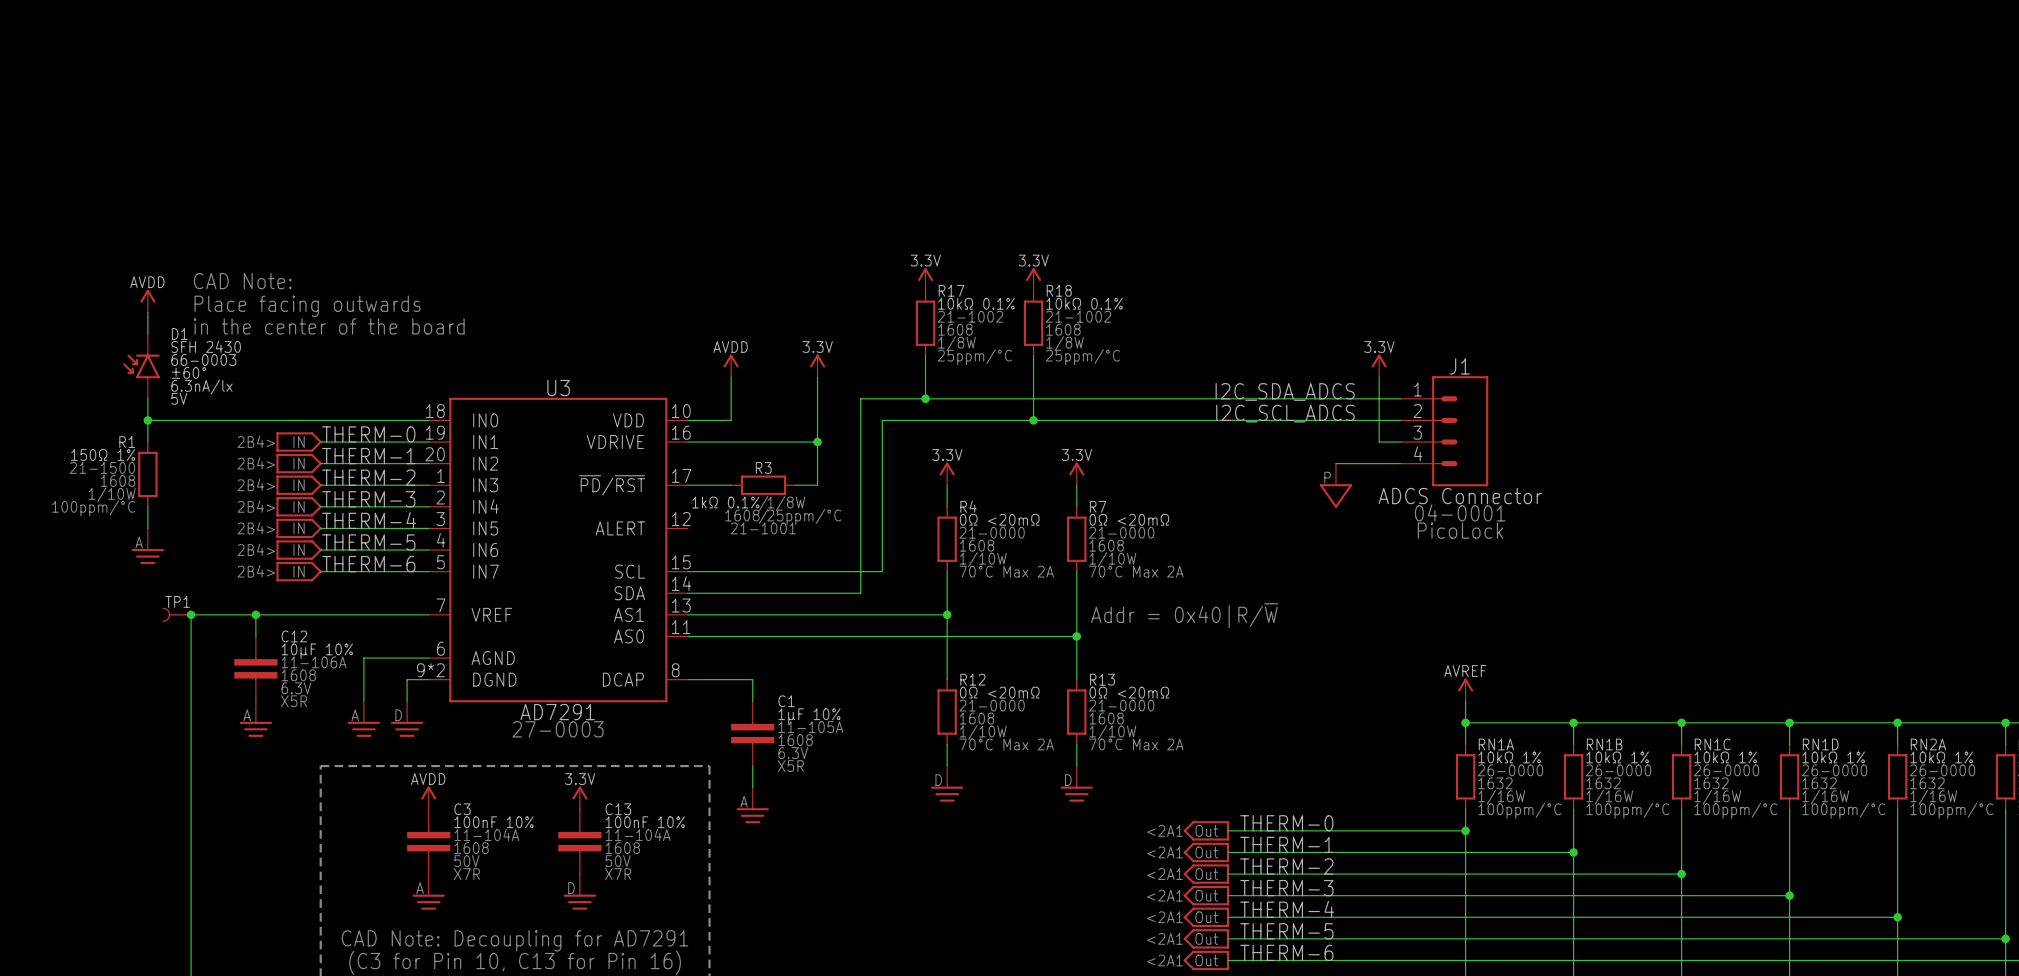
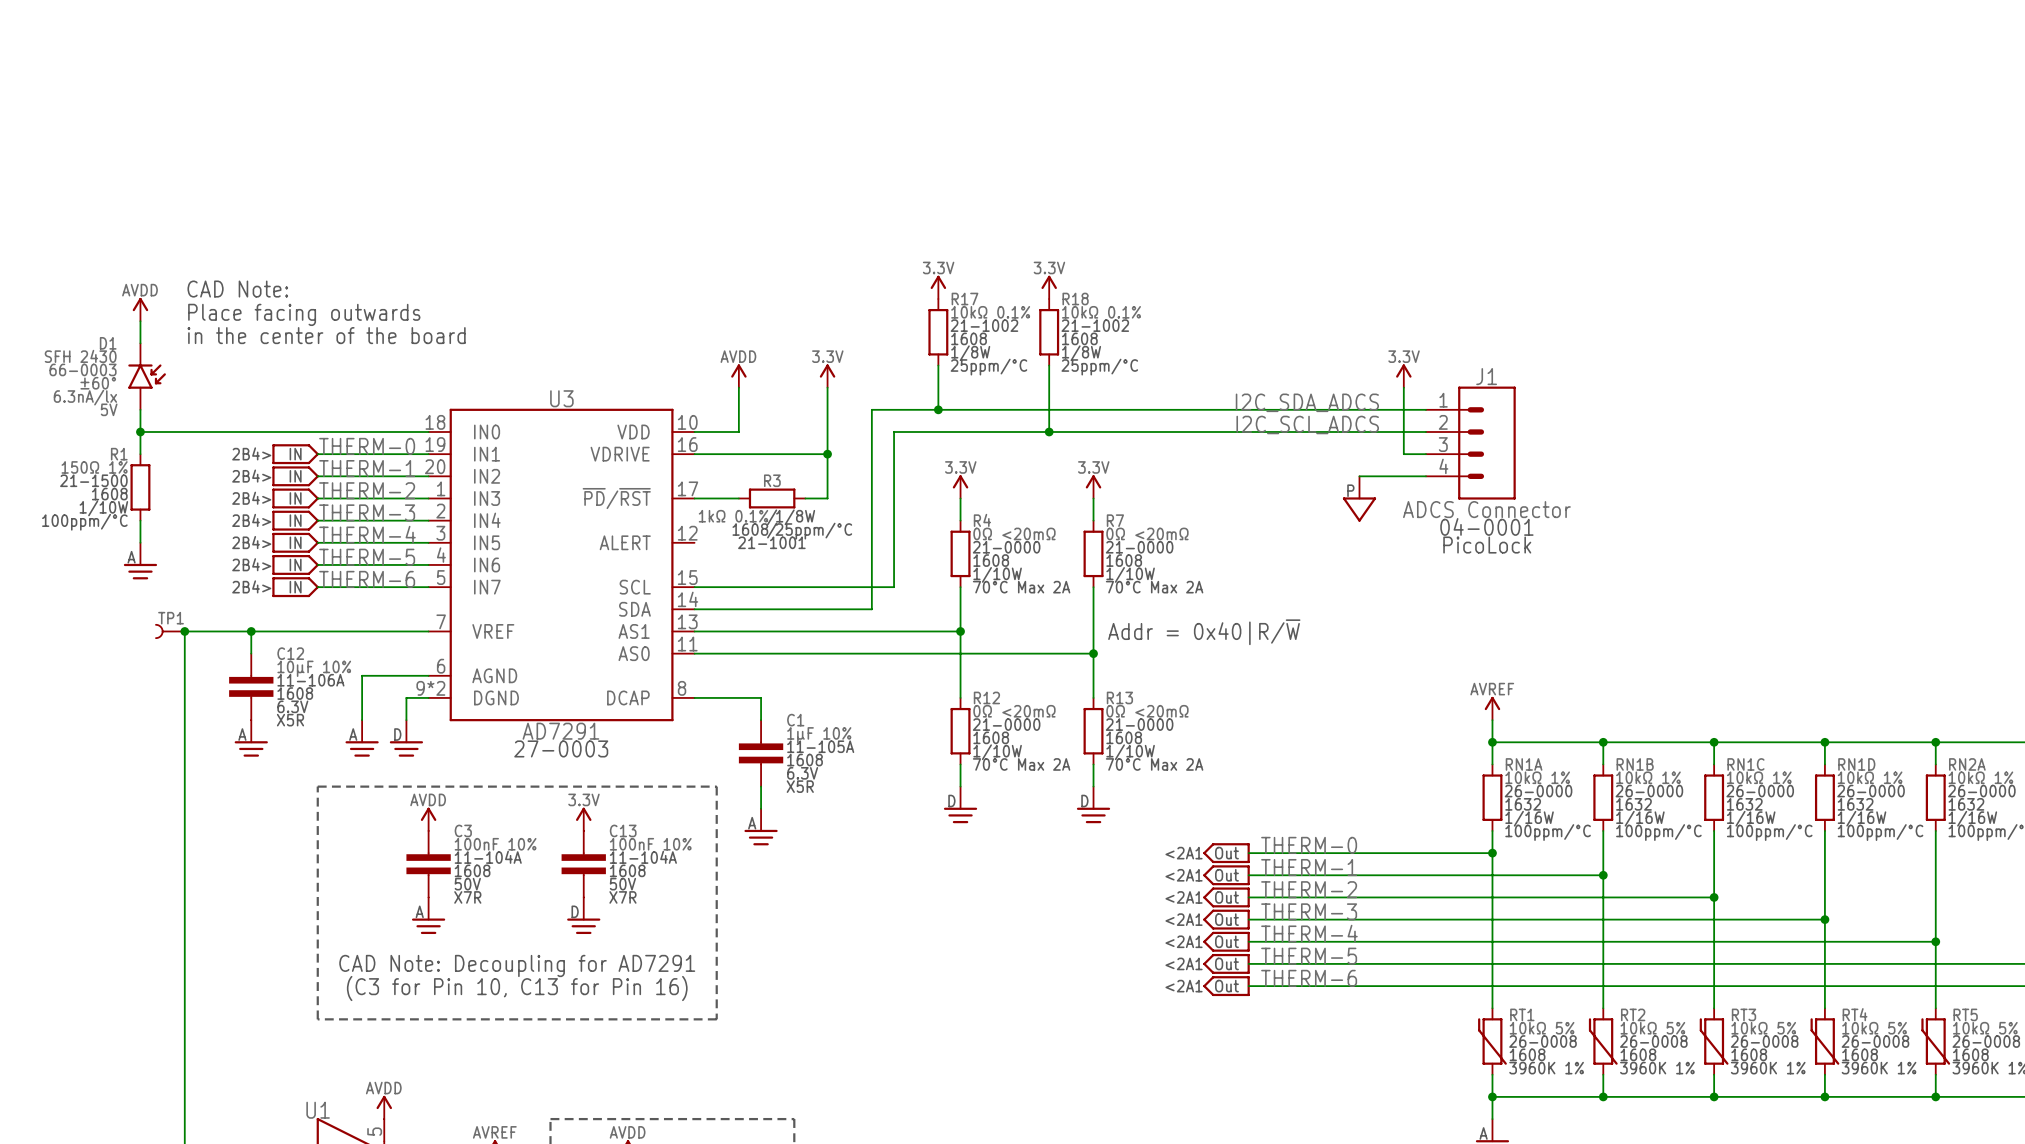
D1 flip: as is (141, 366) -> left-right (147, 376)

